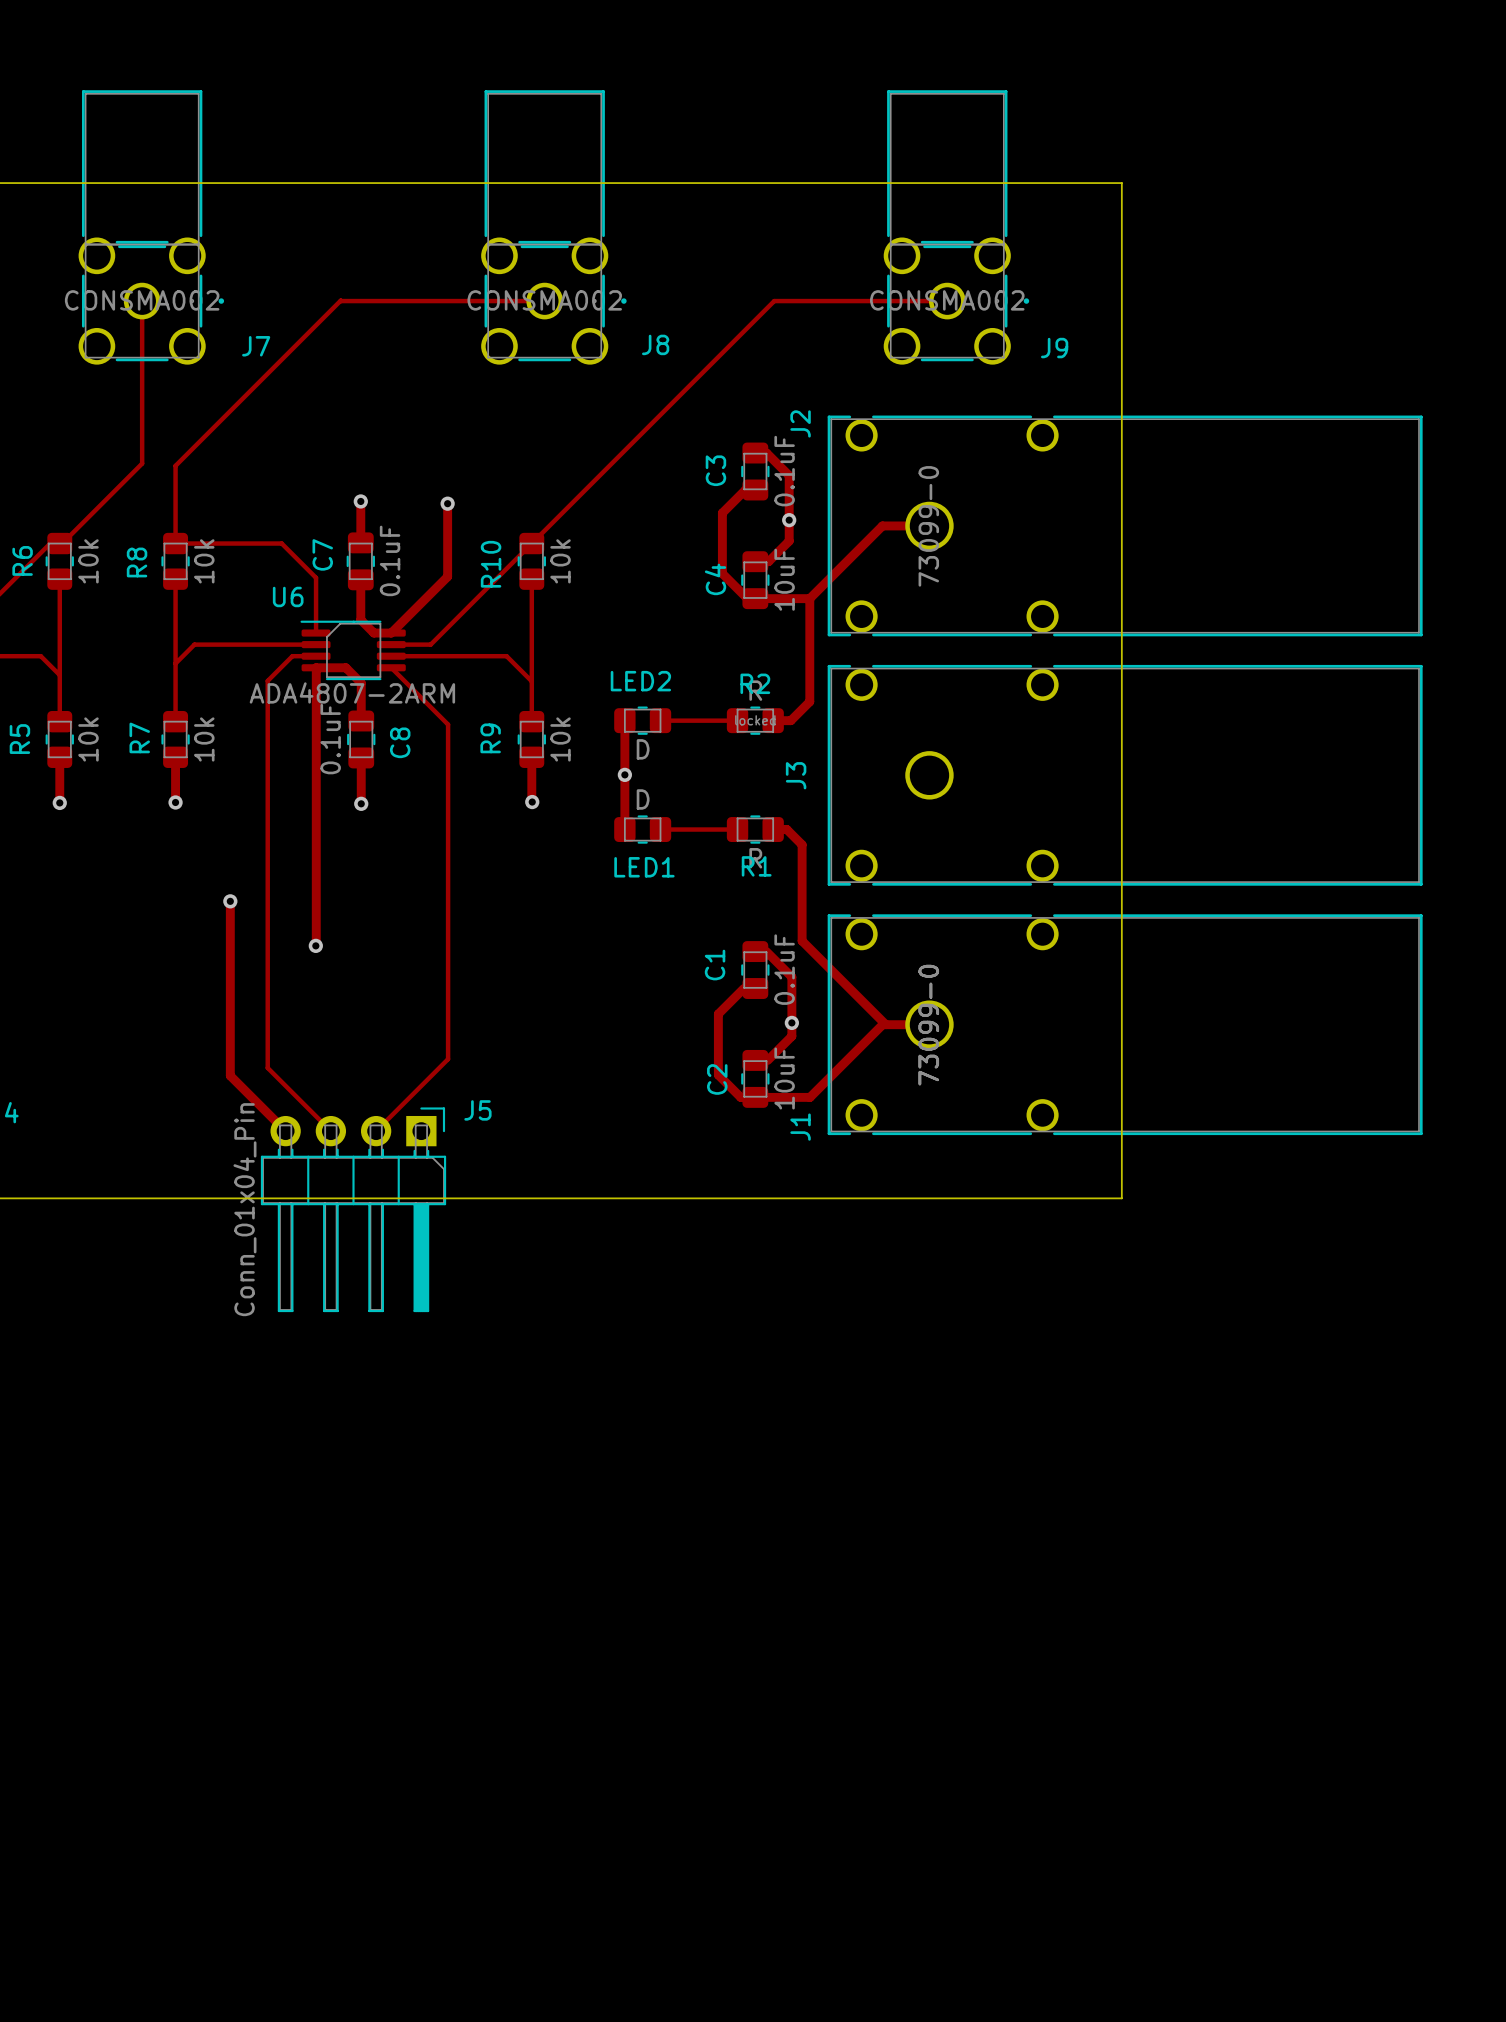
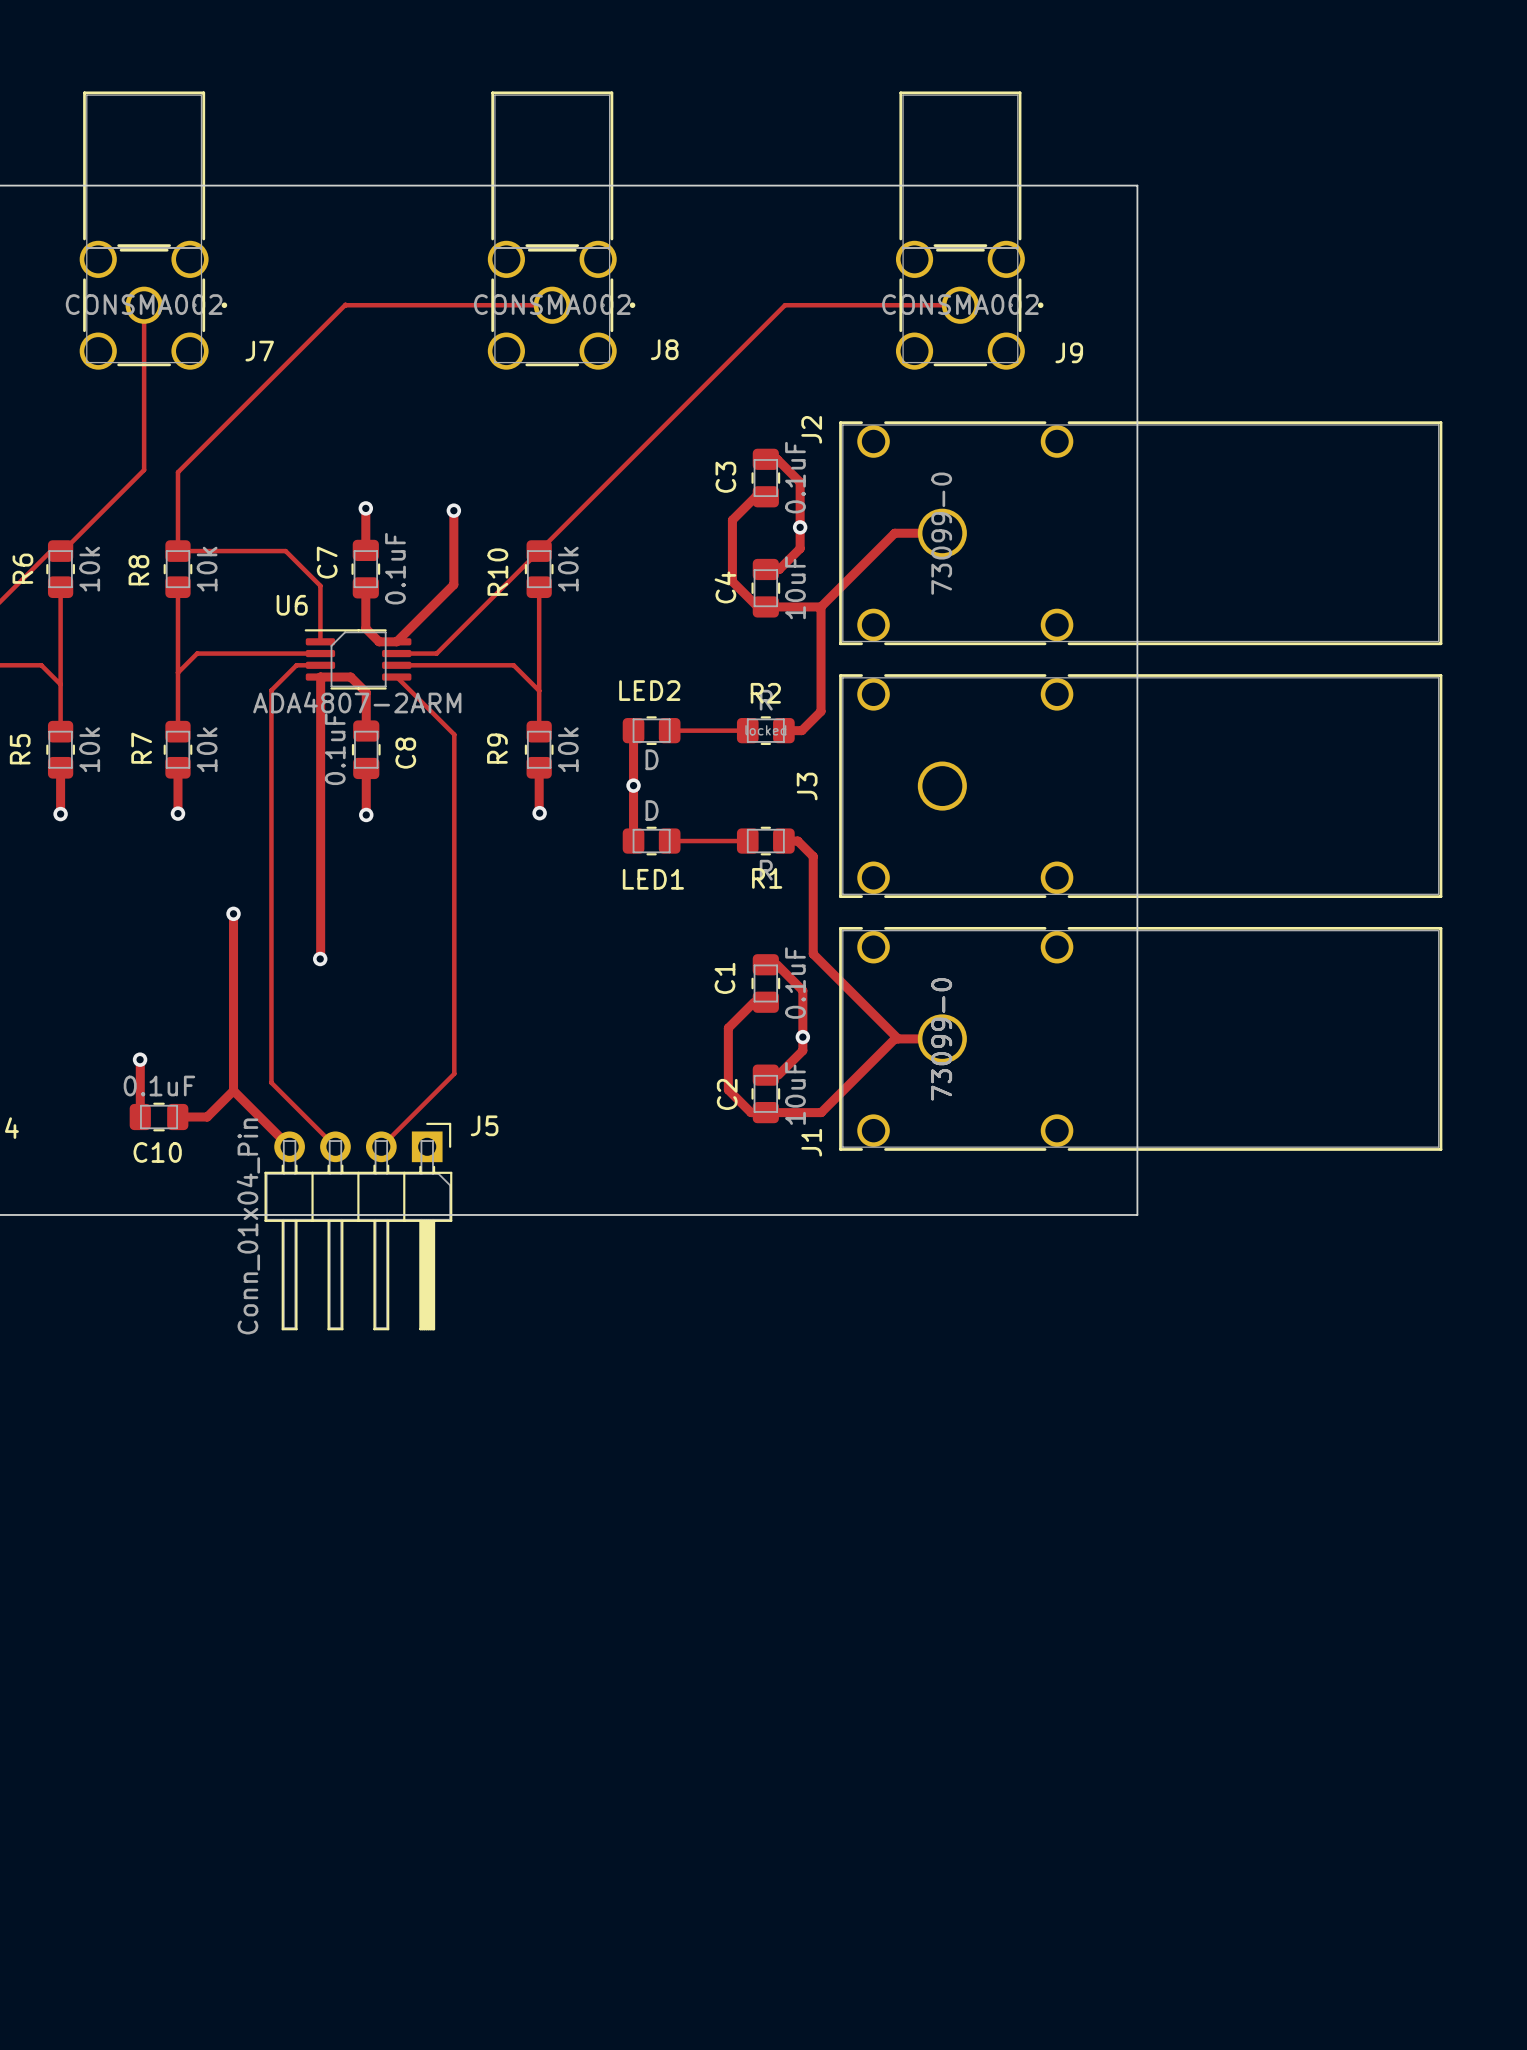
track: none -> (140, 1059) (140, 1117)
via: none -> (140, 1059)
track: none -> (233, 1090) (207, 1117) (177, 1117)
C10: none -> 0.1uF (159, 1117)

